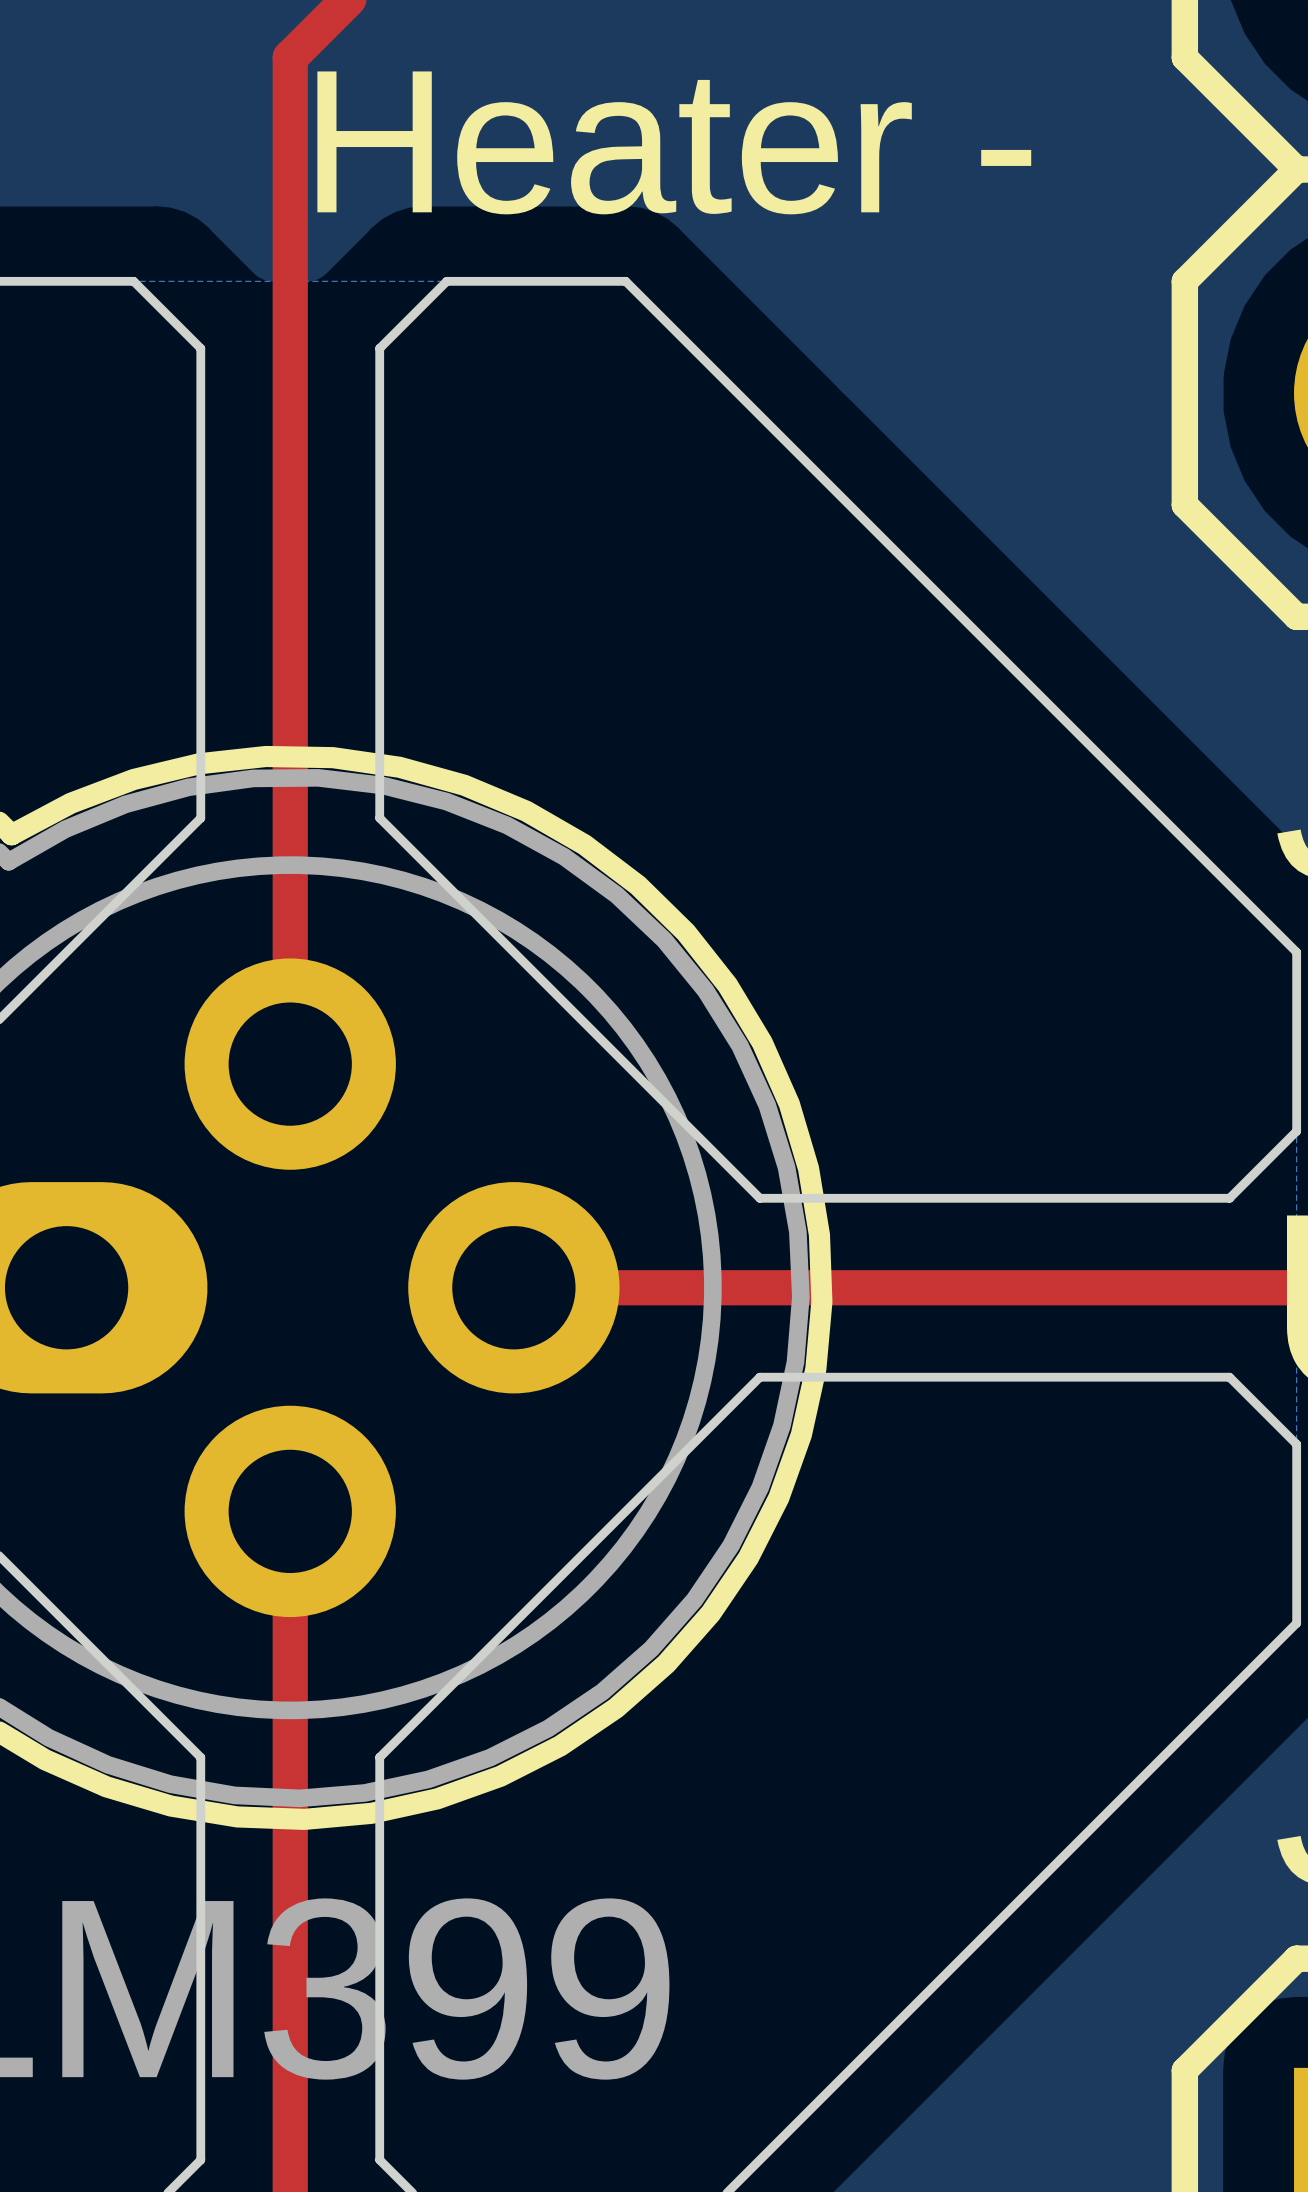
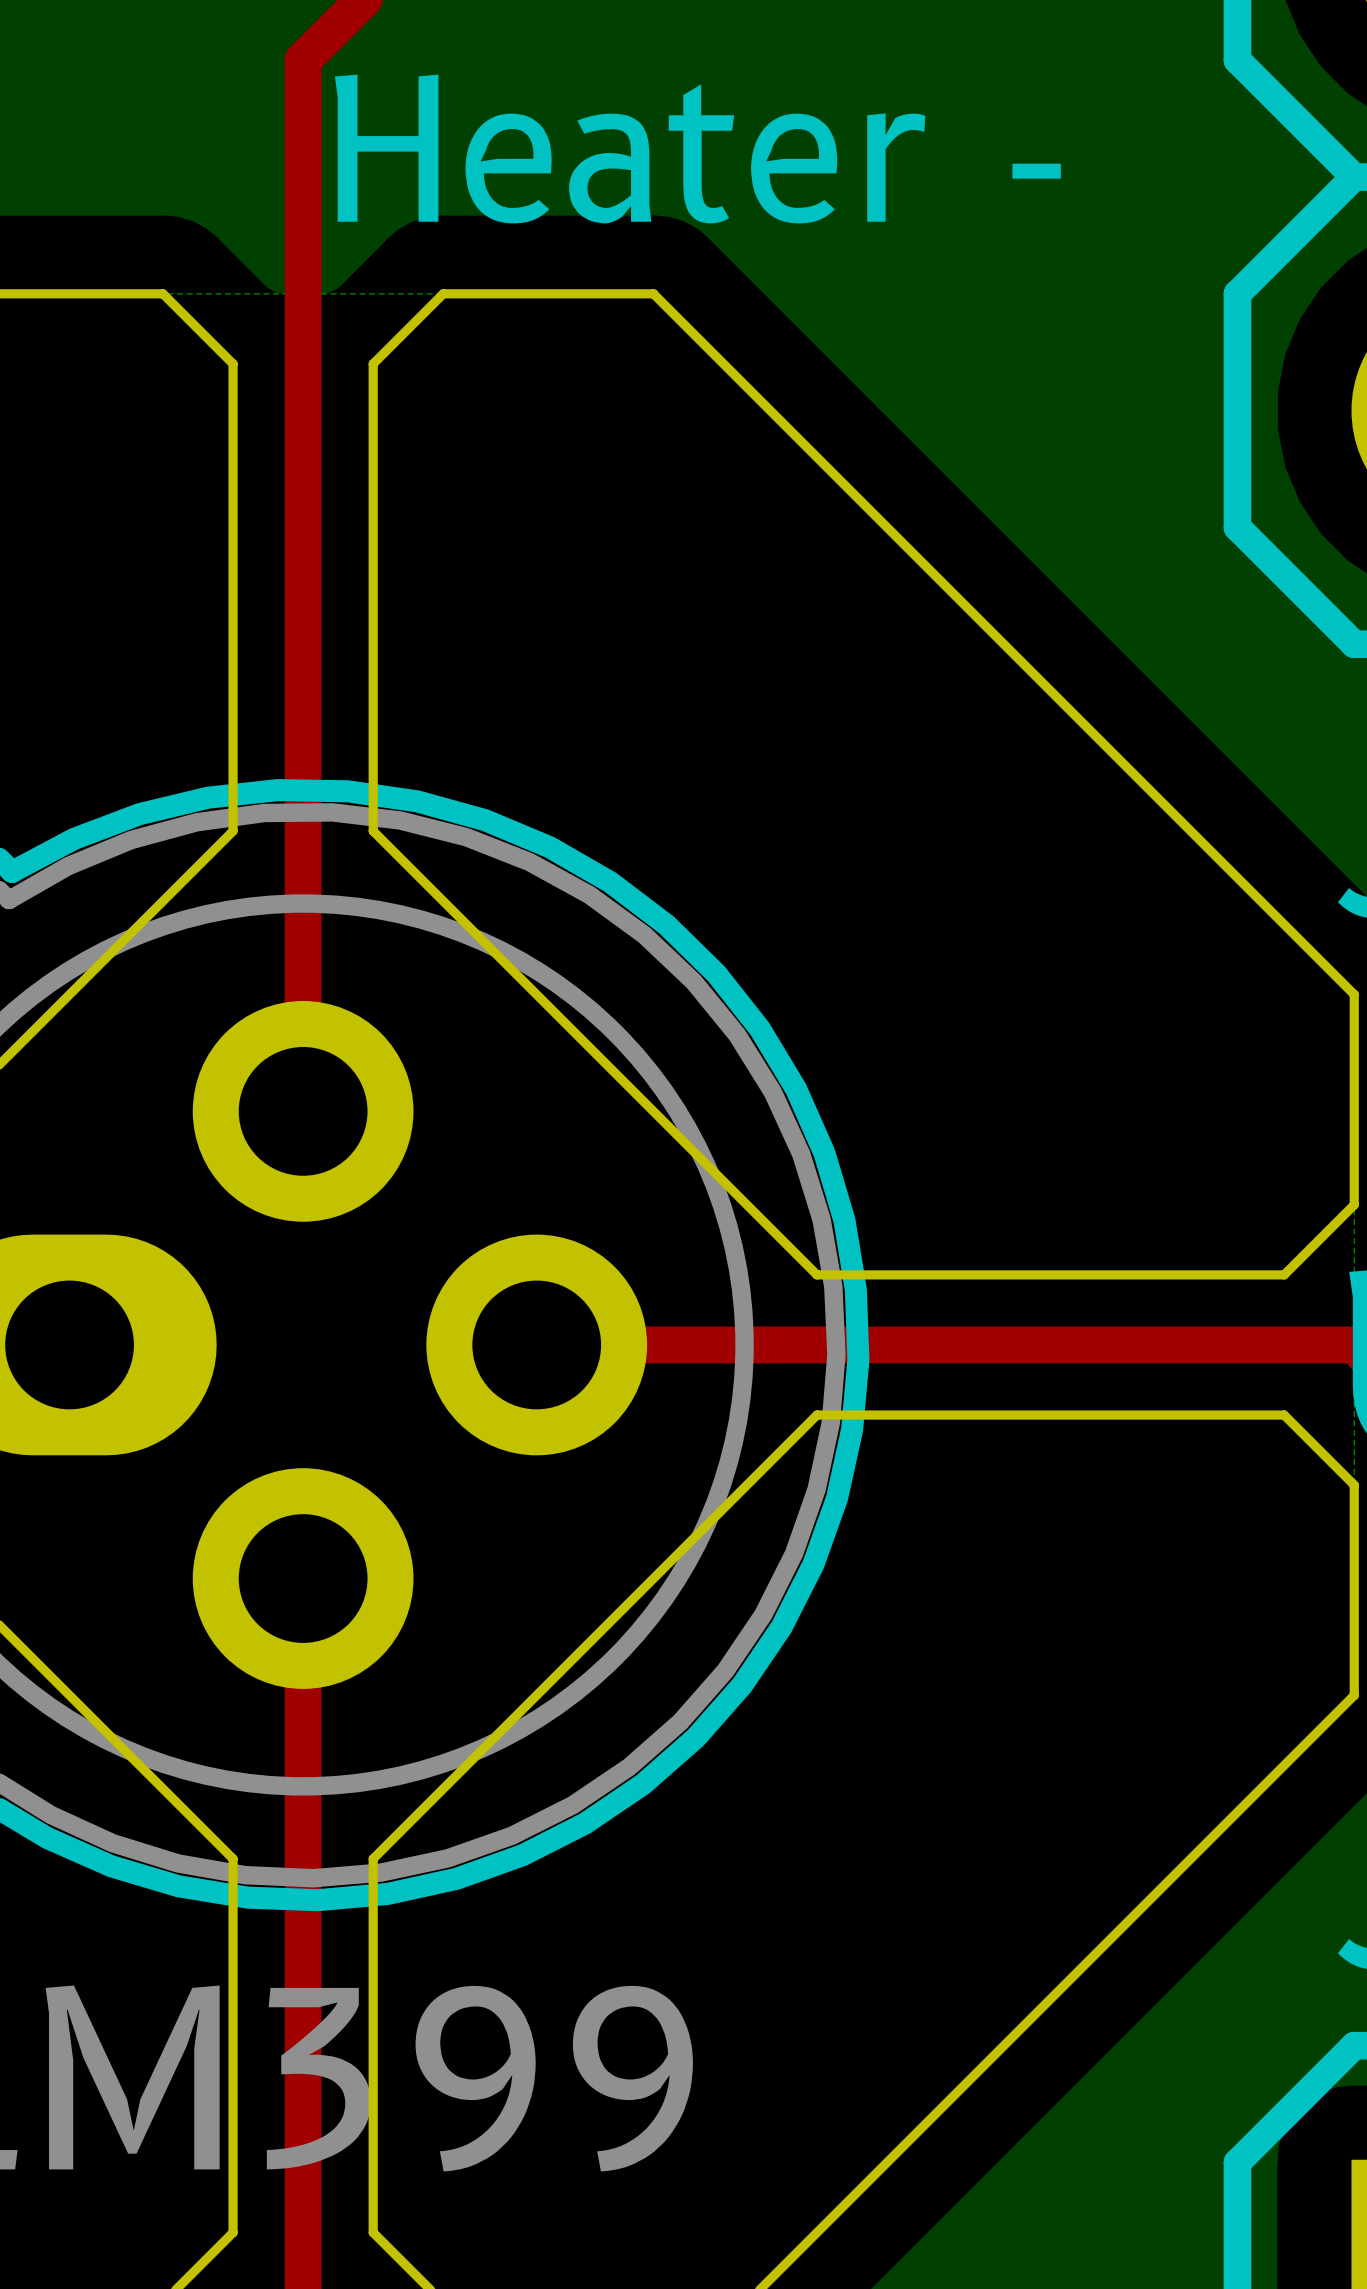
board edge: (133, 281) (200, 348) (200, 818) -> (139, 293) (162, 293) (233, 363) (233, 831) (209, 854)
board edge: (446, 281) (379, 348) (379, 818) -> (466, 293) (443, 293) (373, 363) (373, 831) (396, 854)
board edge: (1296, 1131) (1229, 1198) (759, 1198) -> (1354, 1181) (1354, 1204) (1284, 1274) (817, 1274) (793, 1251)
board edge: (759, 1377) (1229, 1377) (1296, 1444) -> (793, 1438) (817, 1415) (1284, 1415) (1354, 1485) (1354, 1508)
board edge: (200, 1757) (200, 2159) -> (209, 1835) (233, 1858) (233, 2232) (209, 2255)
board edge: (379, 1757) (379, 2159) -> (396, 1835) (373, 1858) (373, 2232) (396, 2255)

